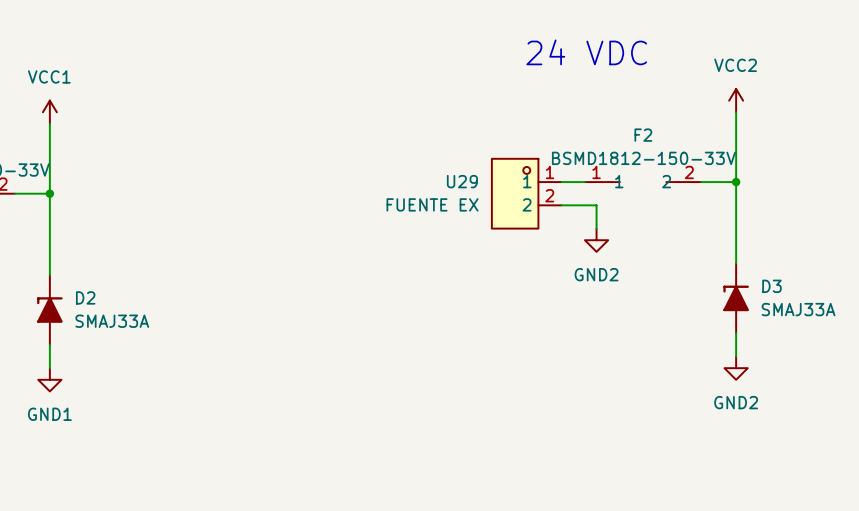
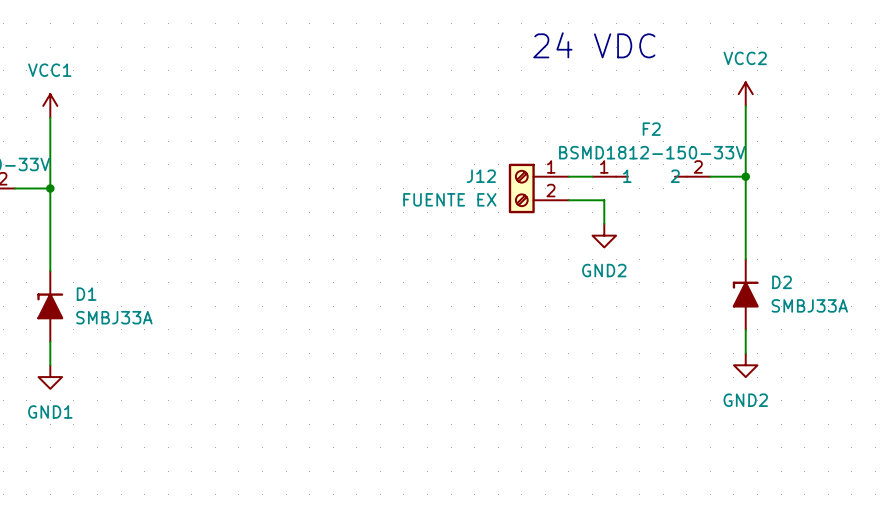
U29: FUENTE EX (526, 193) -> none
J12: none -> FUENTE EX (538, 188)
D3 name: D3 (771, 286) -> D2 (782, 282)
D2 name: D2 (85, 297) -> D1 (86, 294)
D3 value: SMAJ33A (798, 309) -> SMBJ33A (809, 305)
D2 value: SMAJ33A (112, 321) -> SMBJ33A (114, 317)

